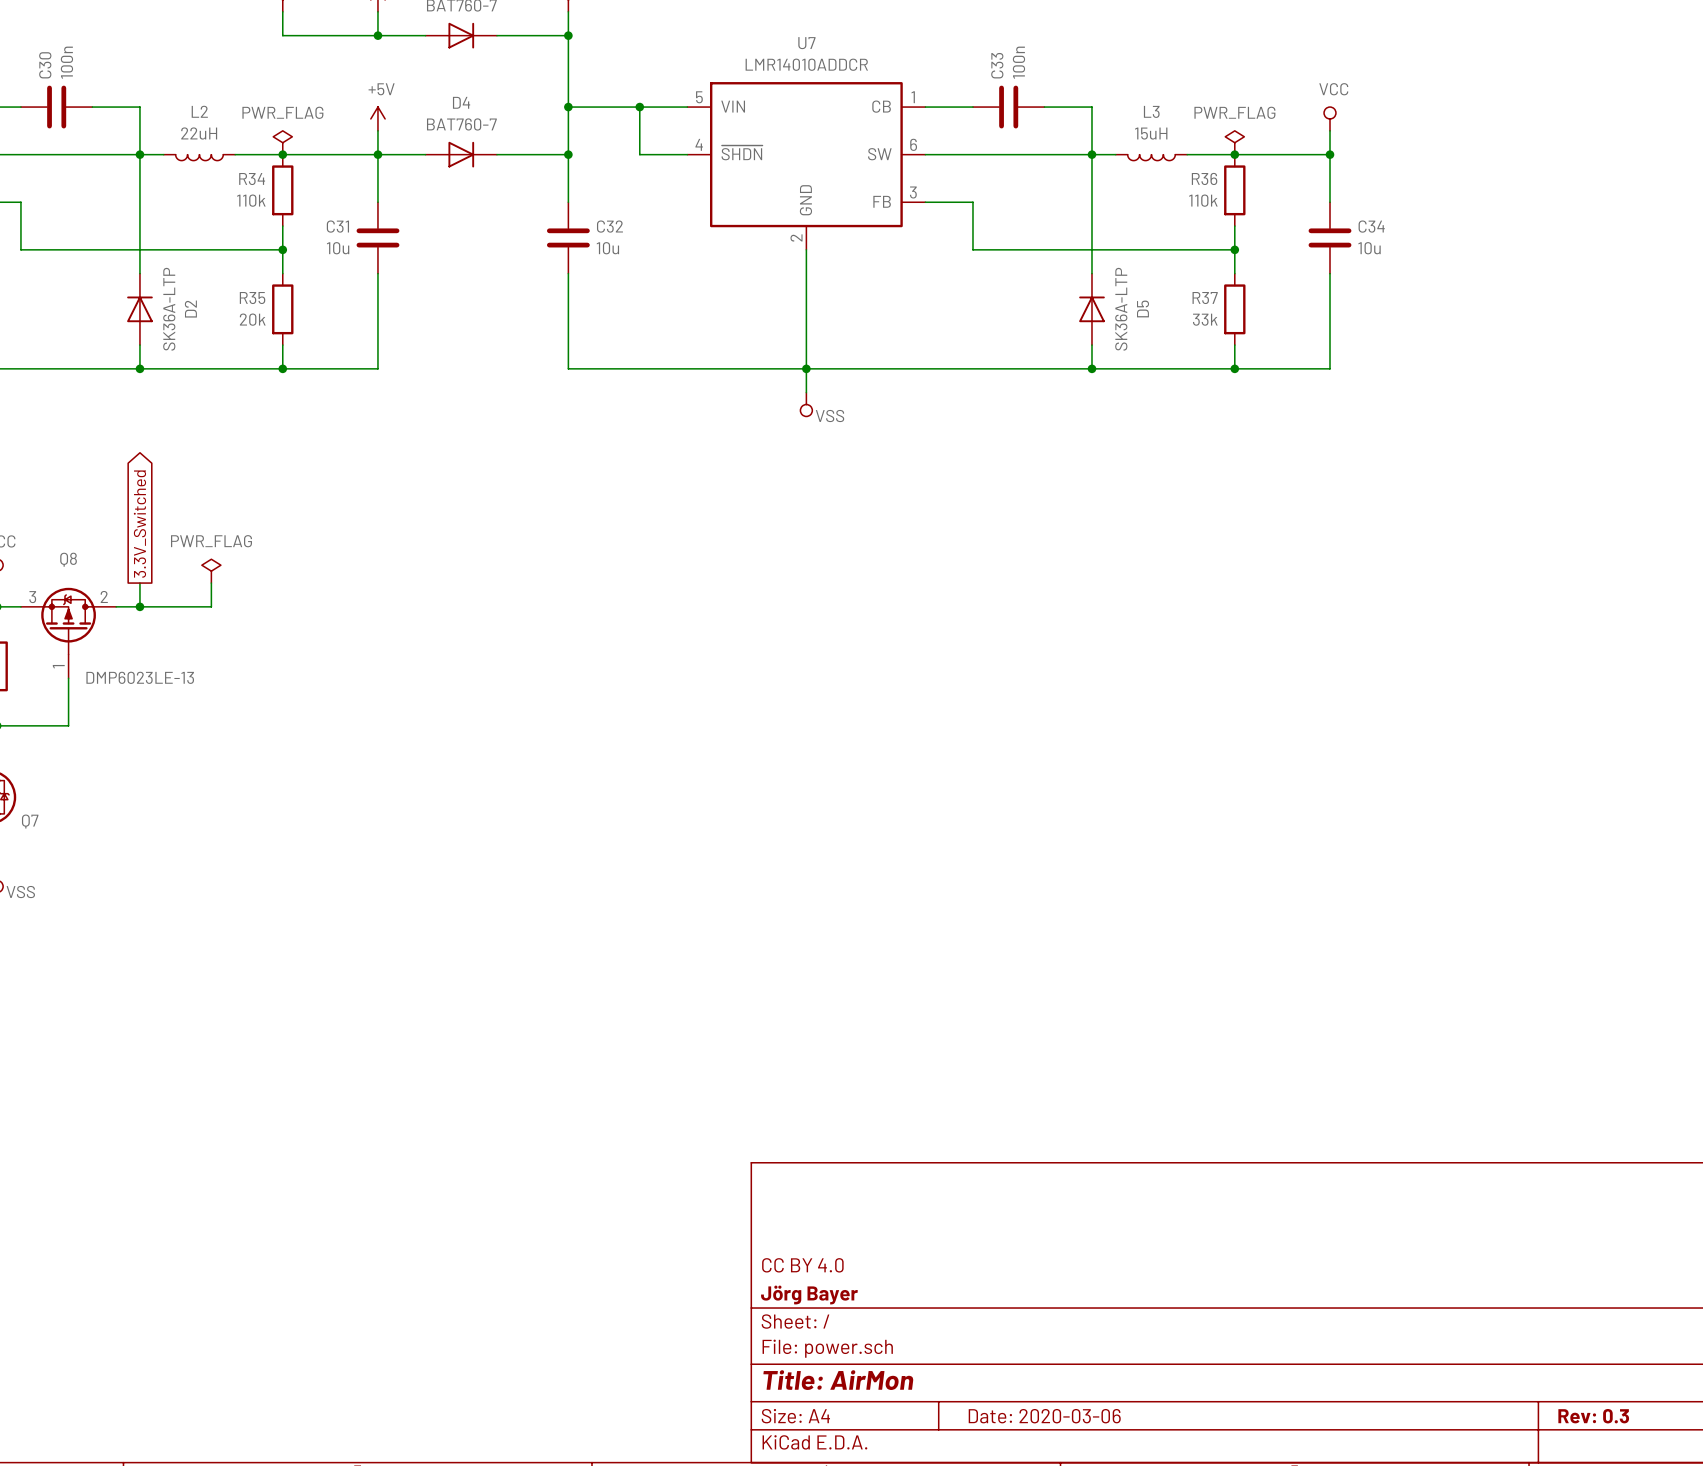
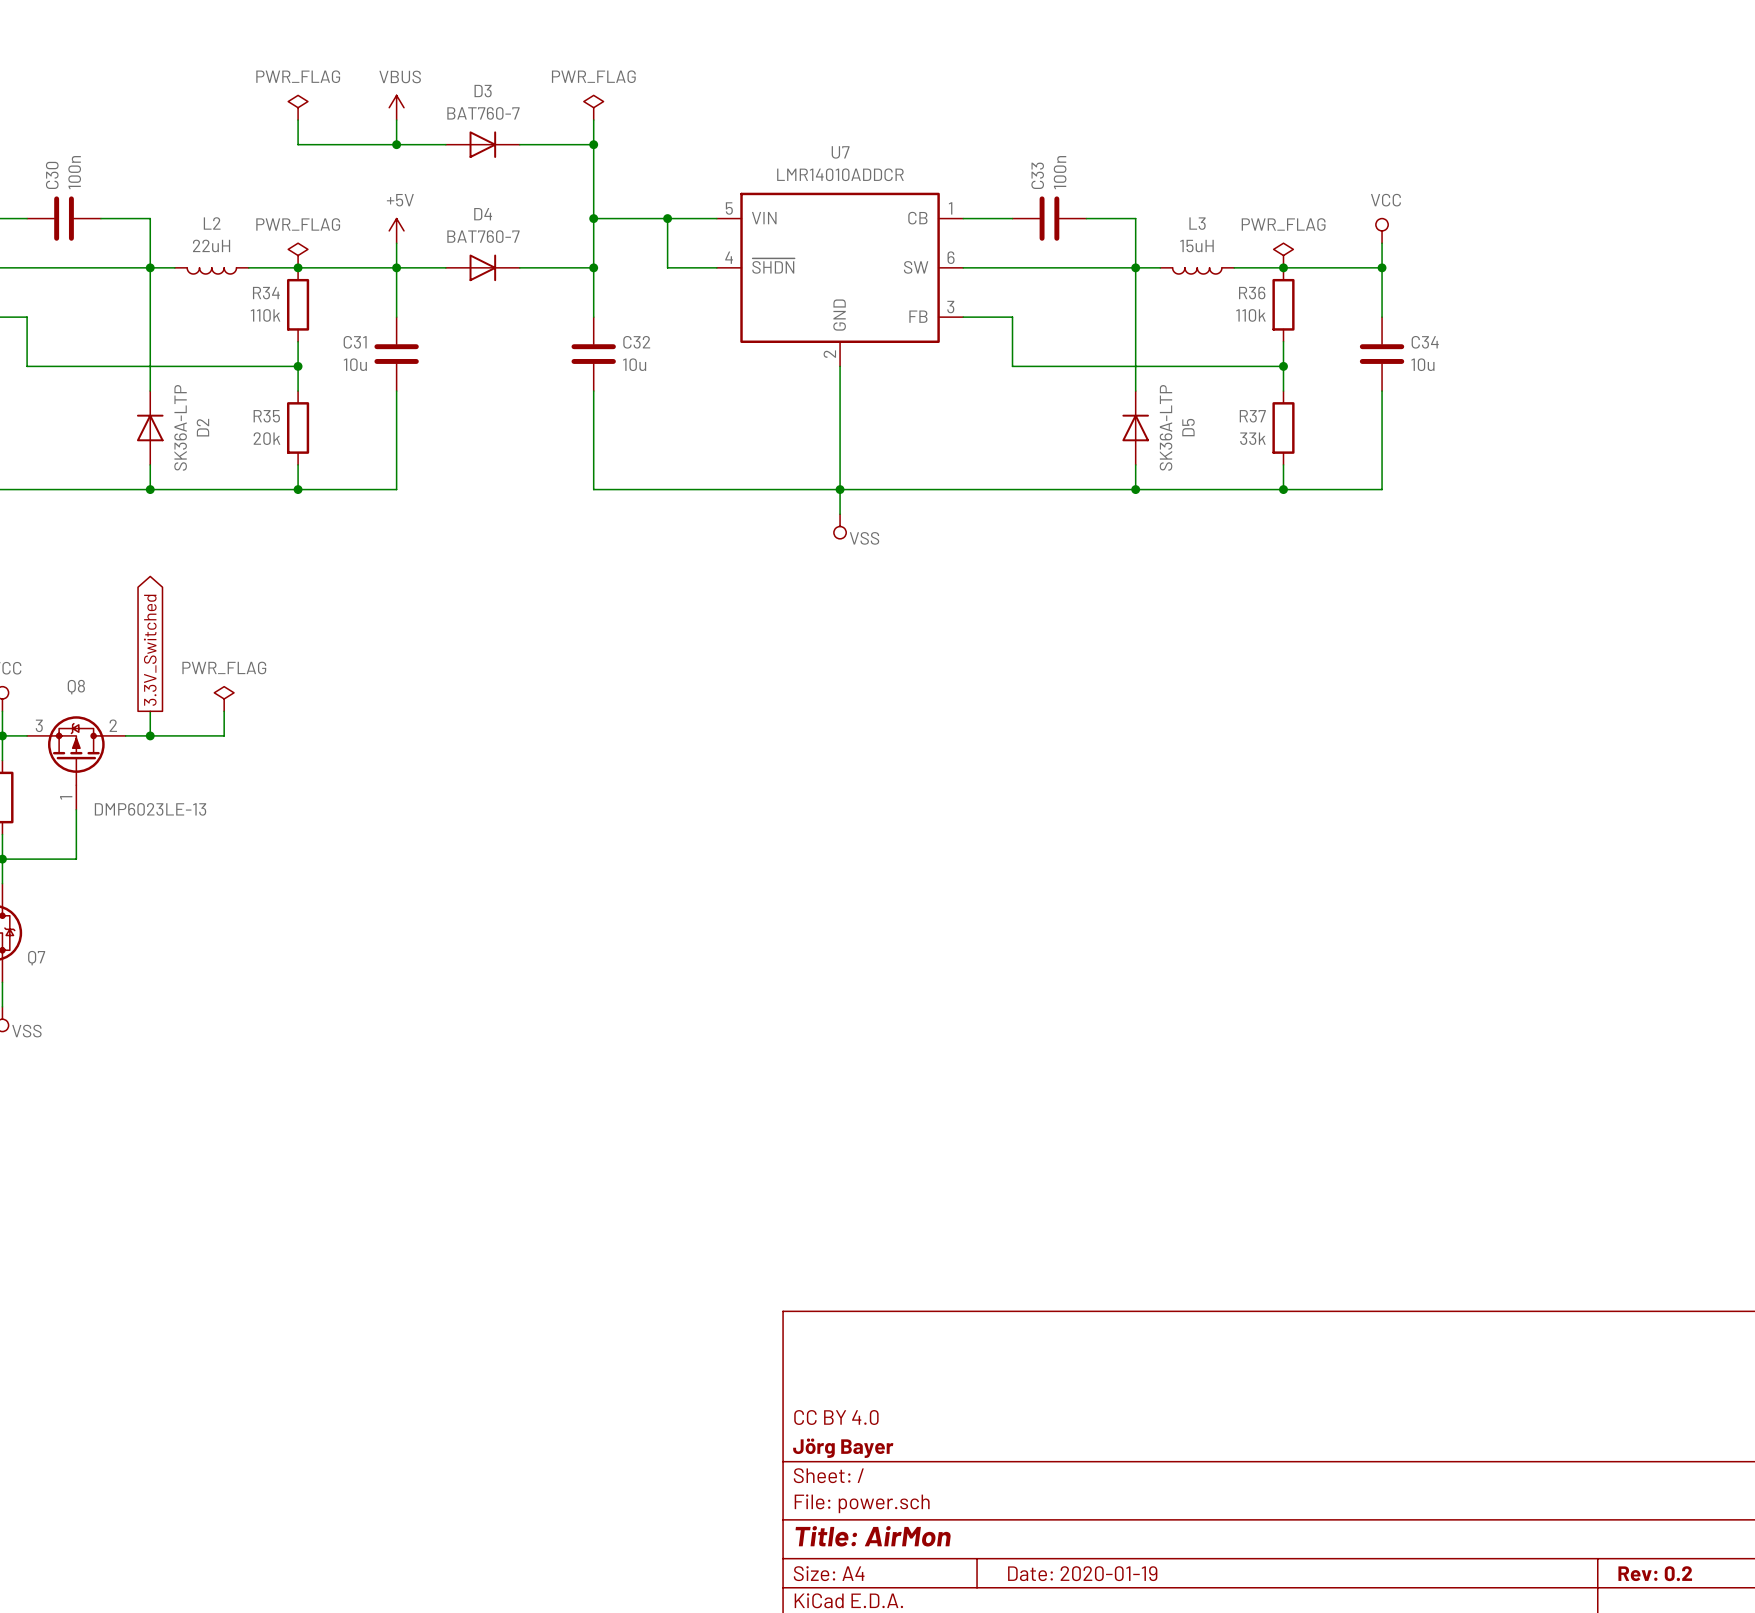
title block: Date: 2020-03-06 (1044, 1416) -> Date: 2020-01-19 (1082, 1573)
title block: Rev: 0.3 (1593, 1416) -> Rev: 0.2 (1655, 1573)

